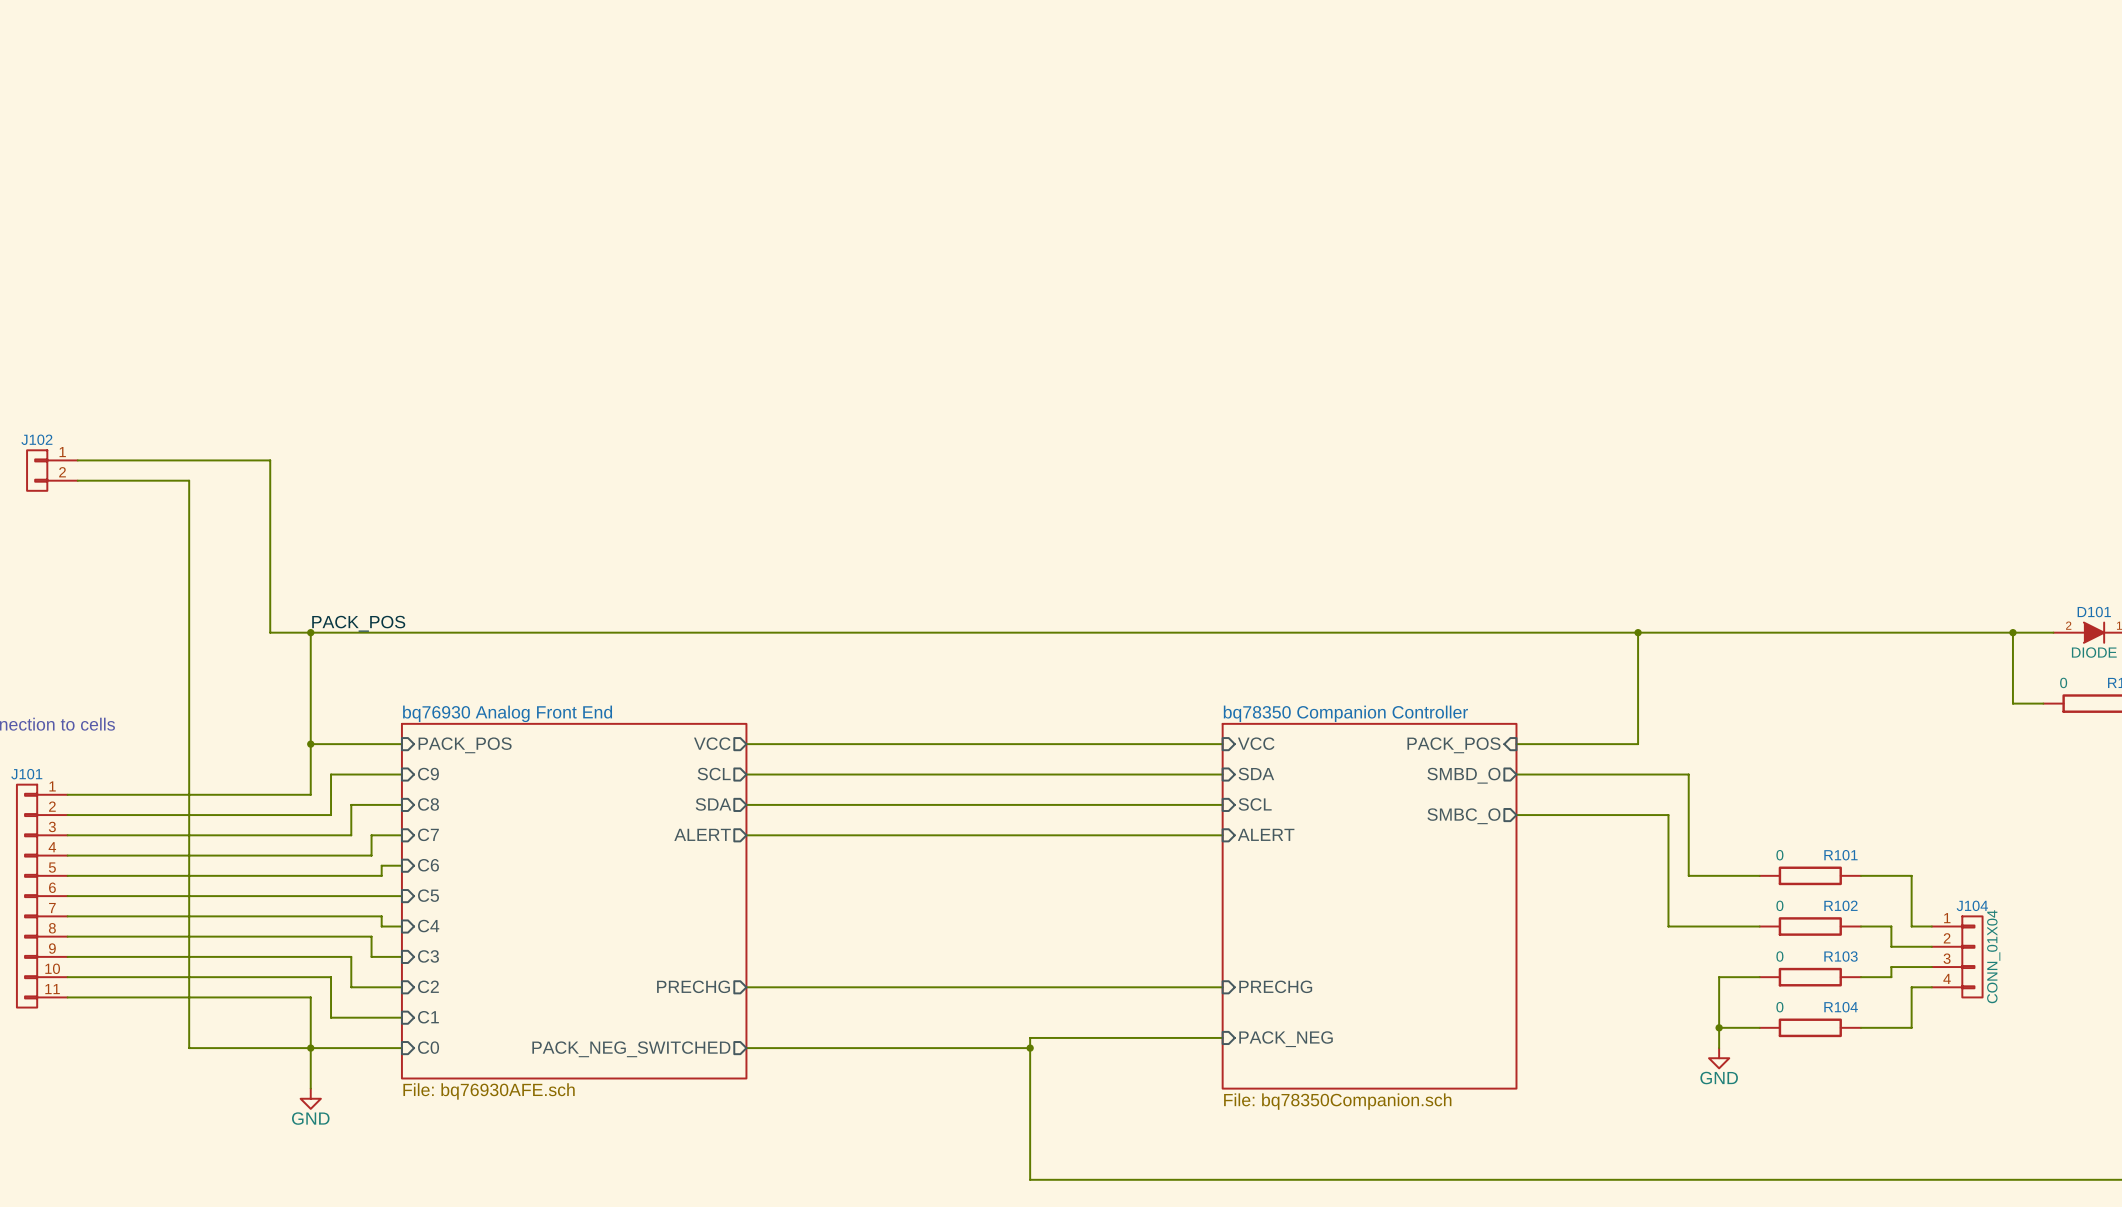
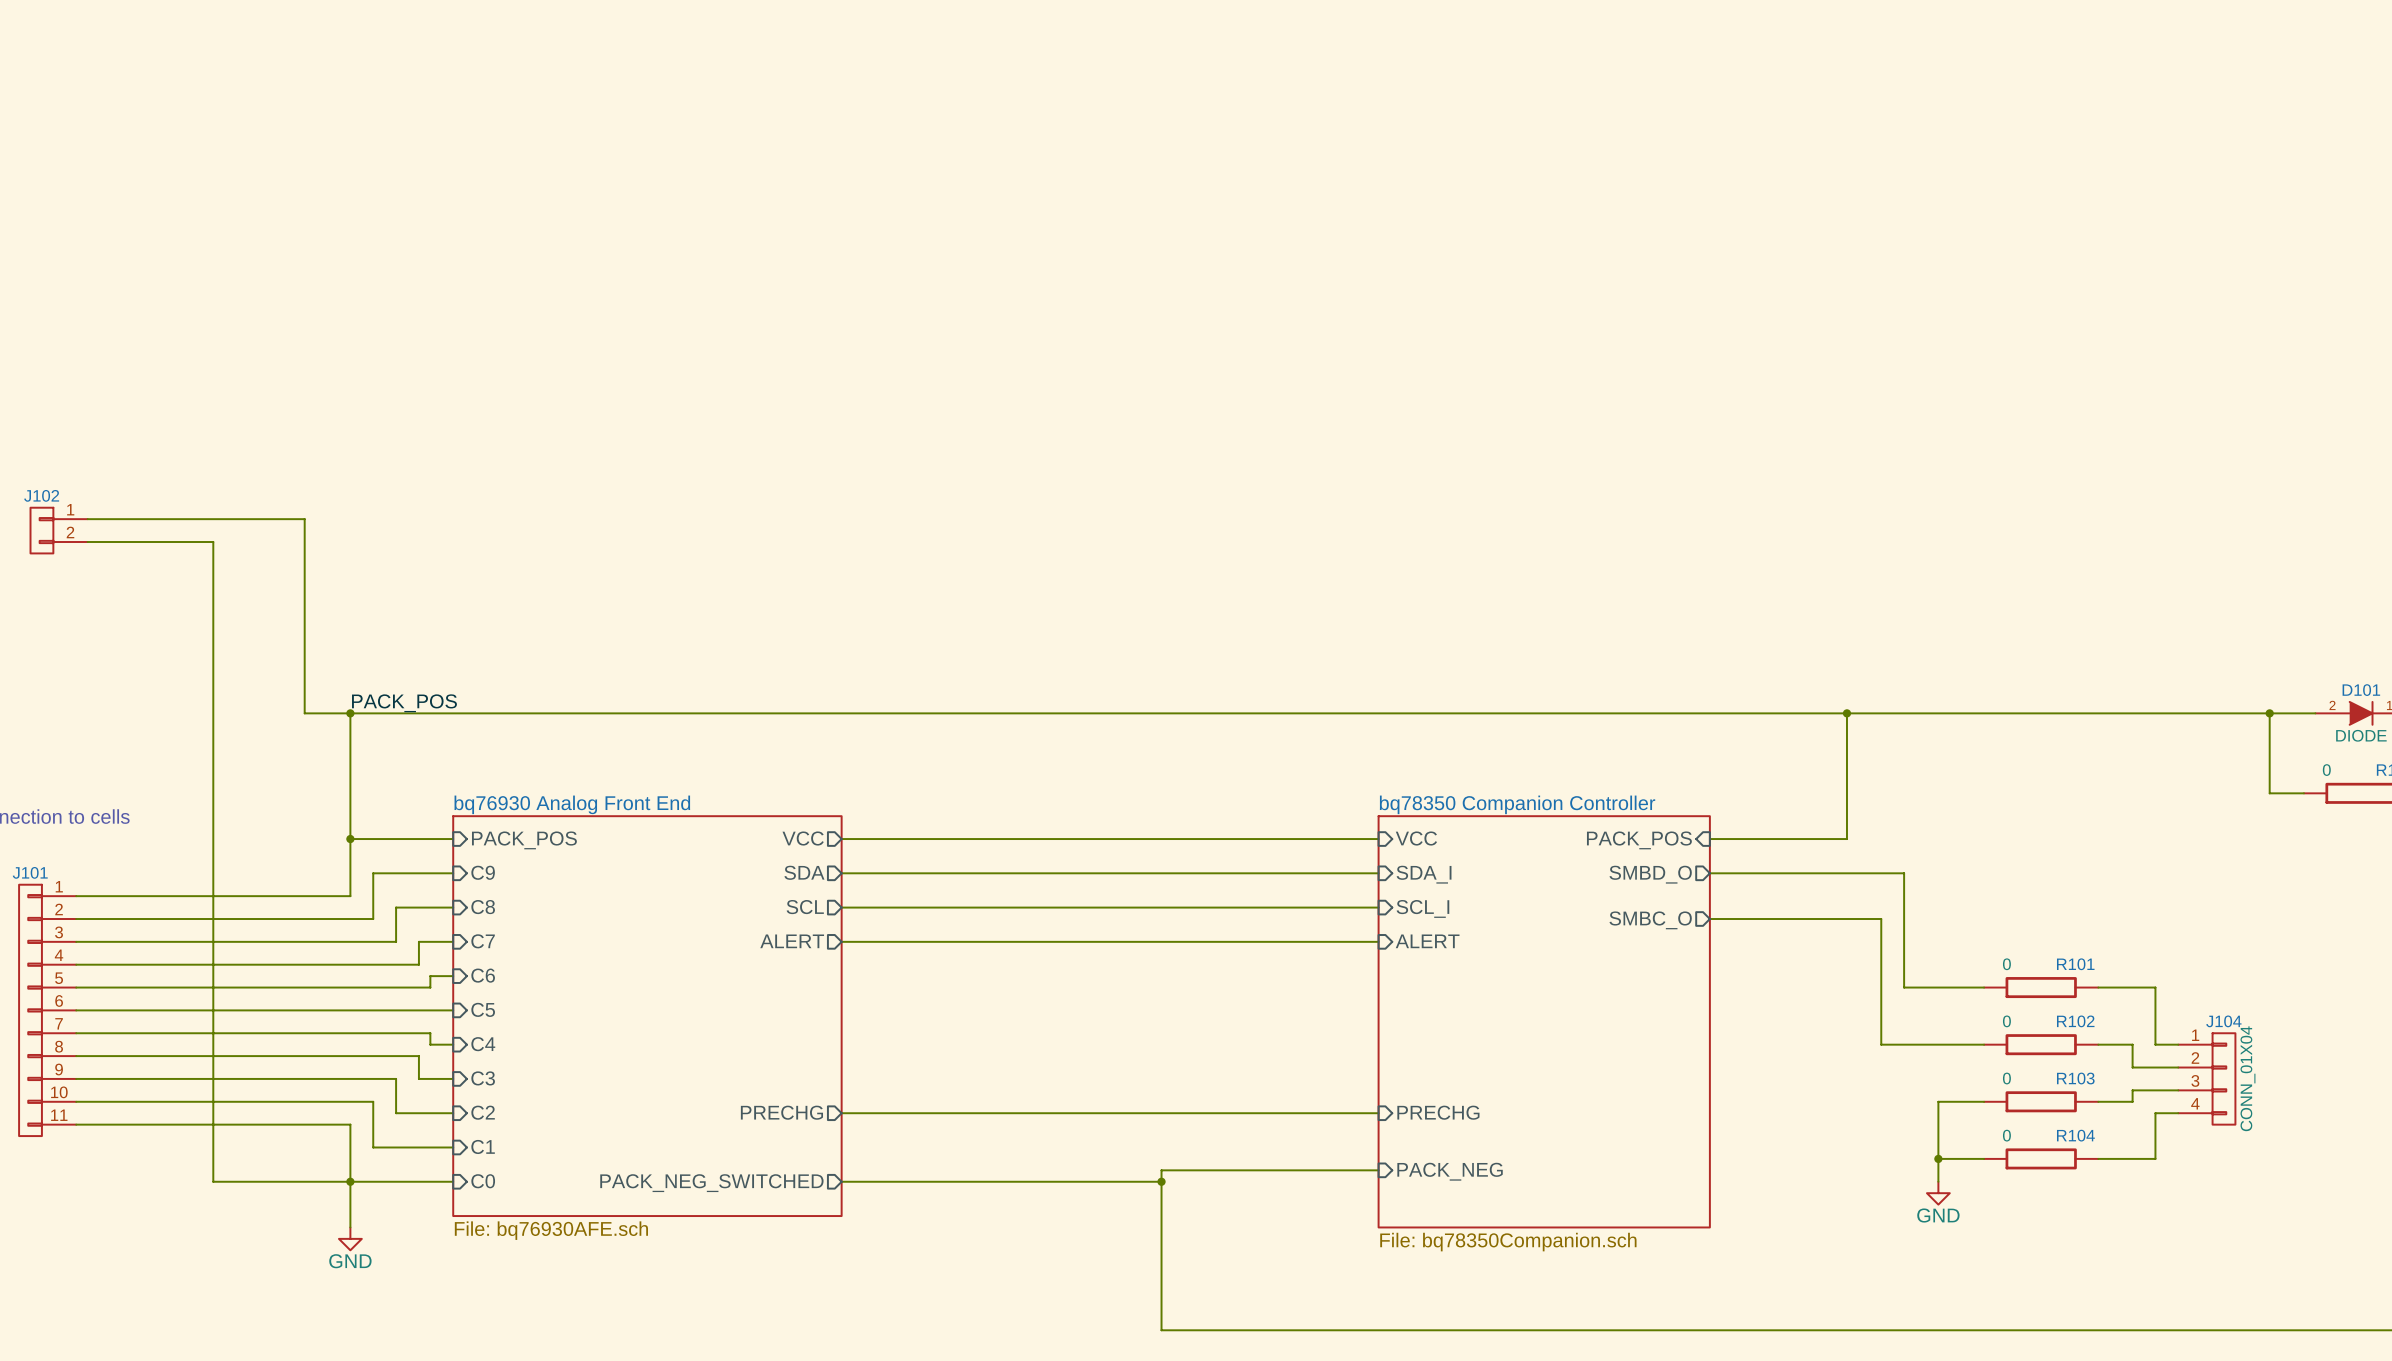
sheet pin: SCL (714, 774) -> SDA (804, 872)
sheet pin: SDA (1256, 774) -> SDA_I (1424, 874)
sheet pin: SDA (713, 804) -> SCL (805, 907)
sheet pin: SCL (1255, 804) -> SCL_I (1422, 908)

